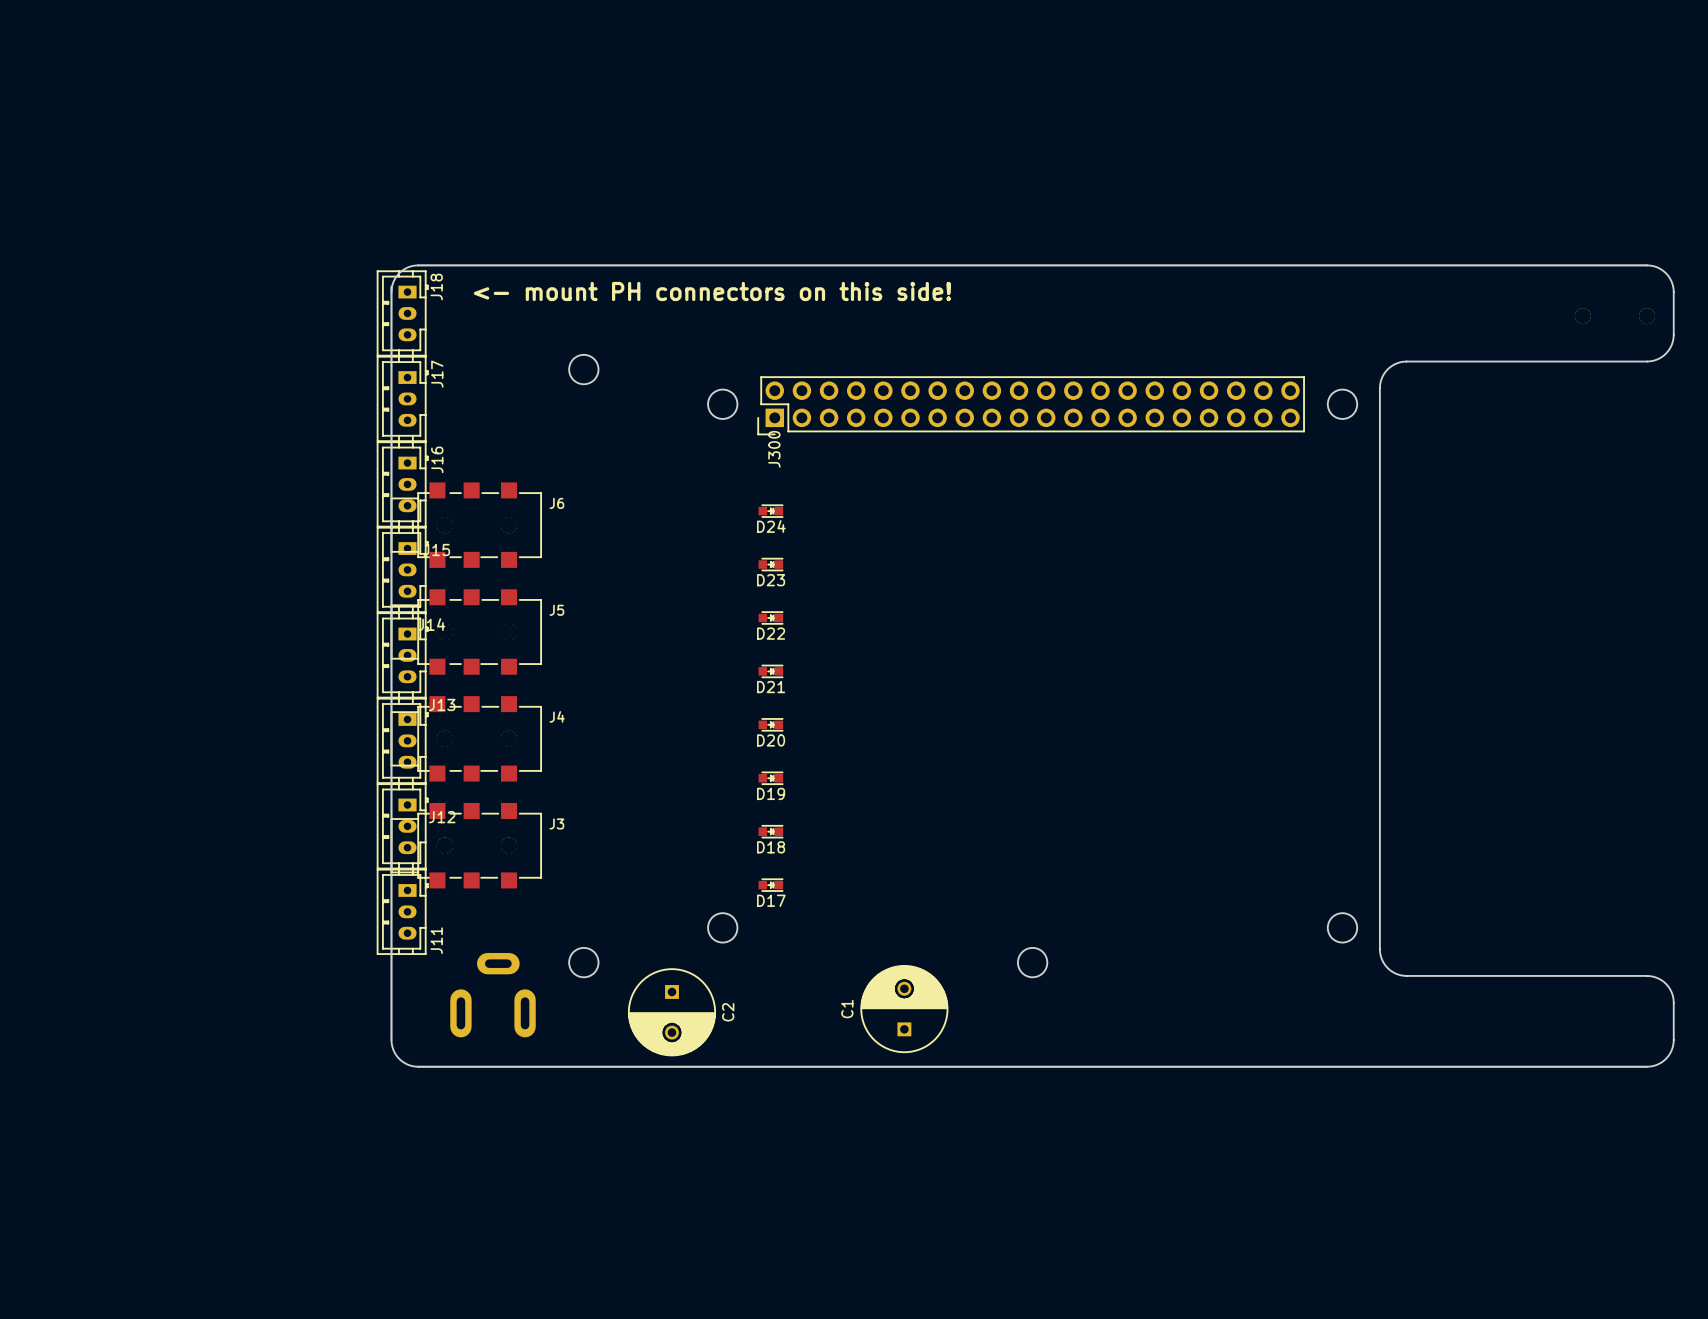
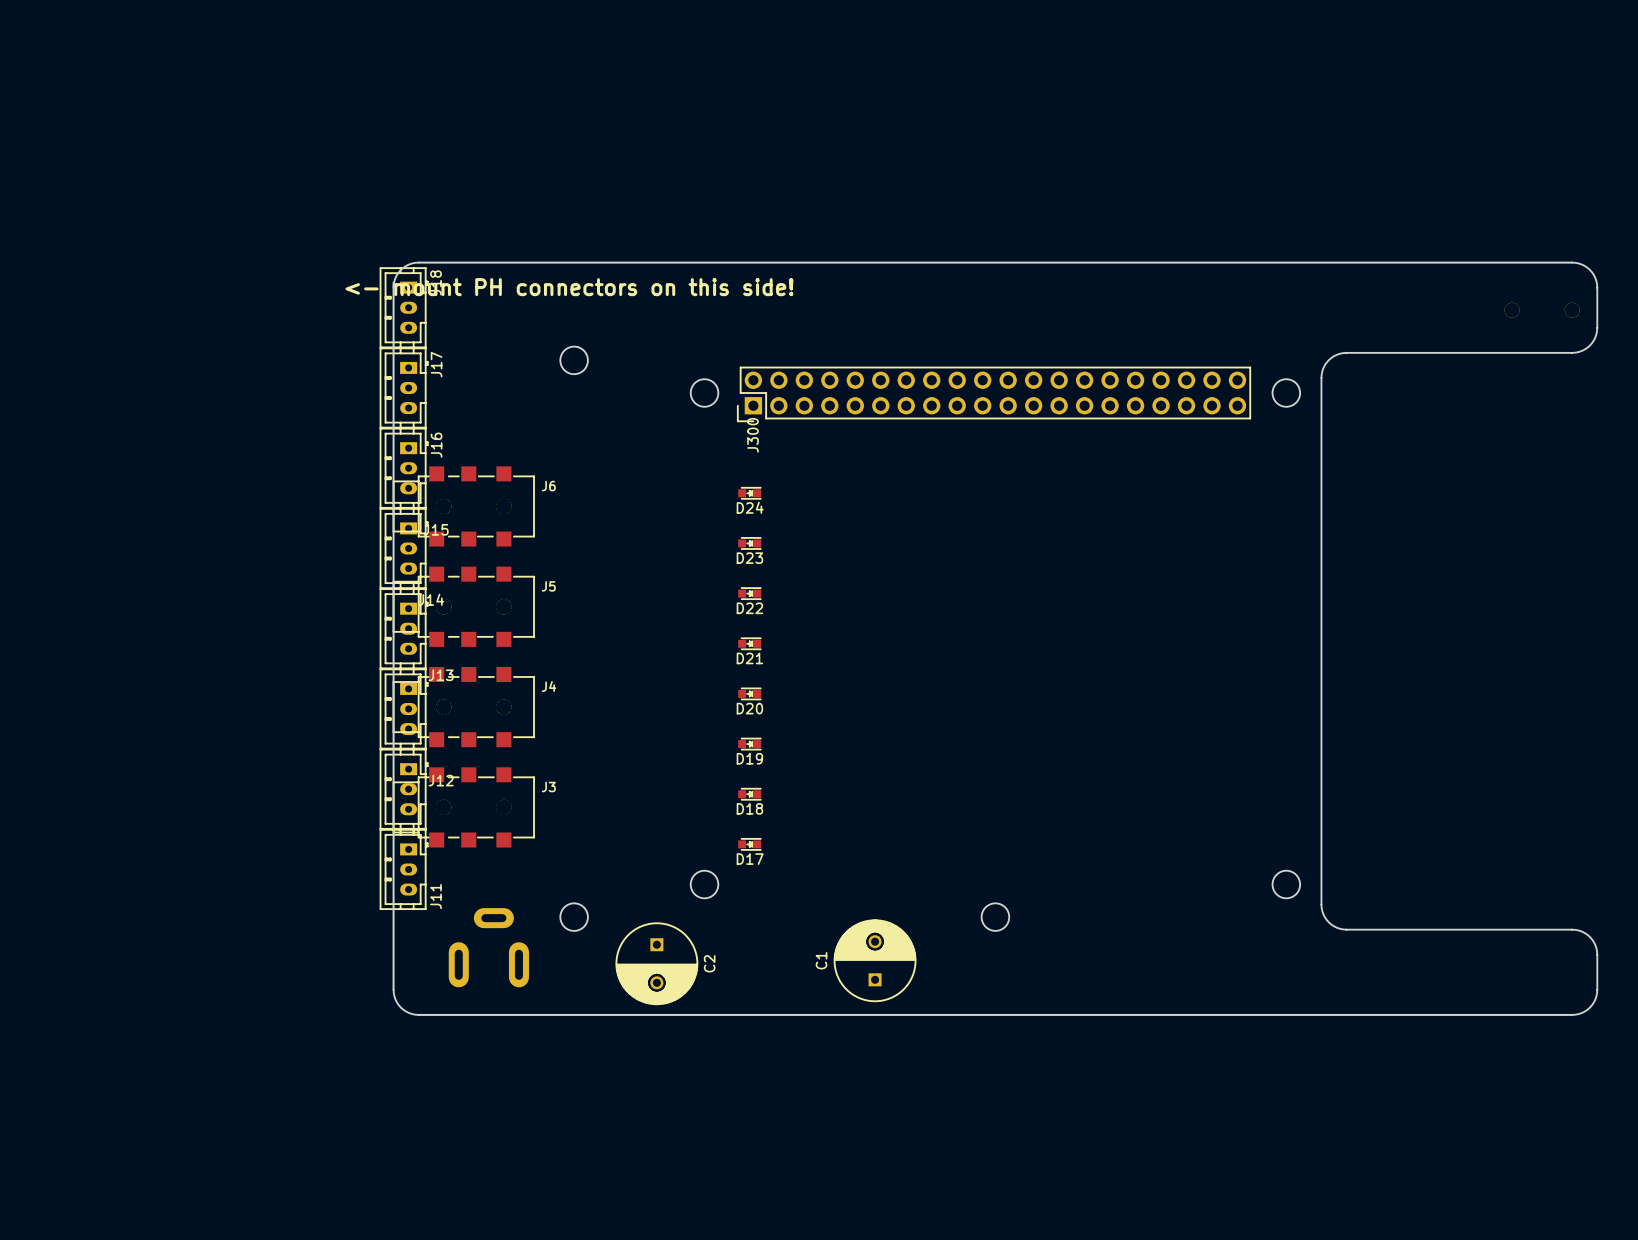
text position: <- mount PH connectors on this side! (712, 291) -> <- mount PH connectors on this side! (569, 287)

